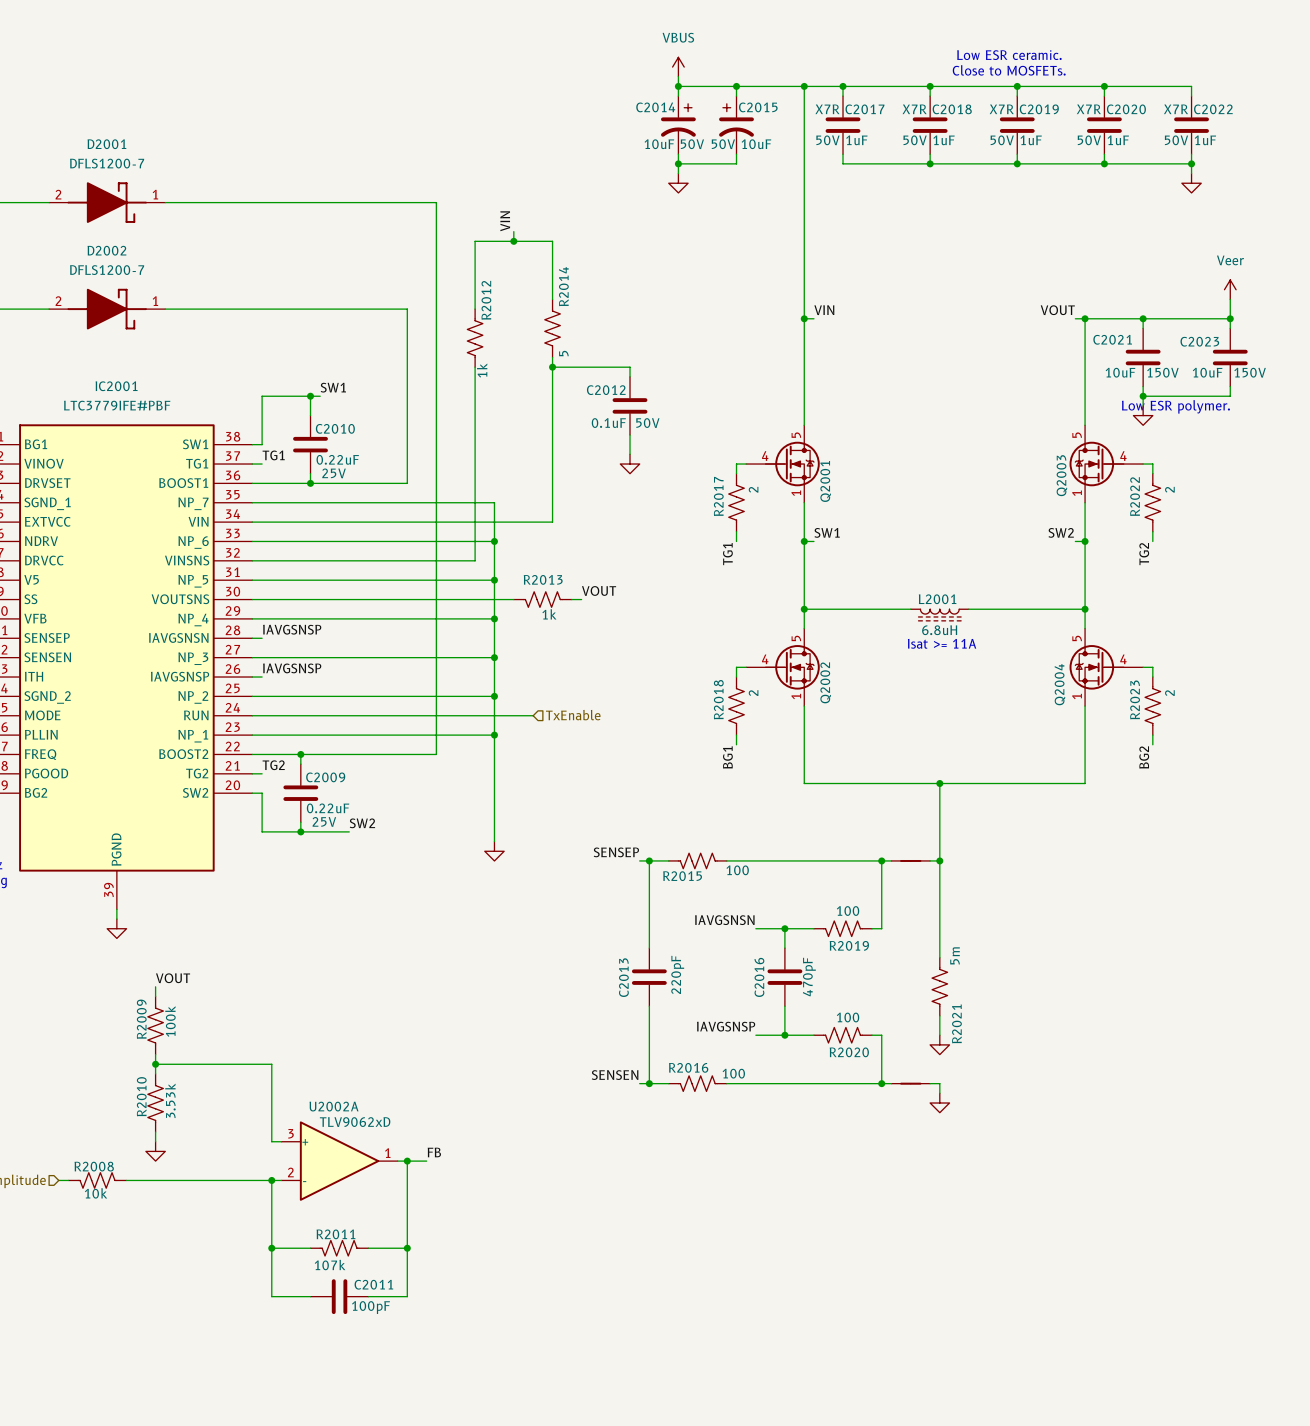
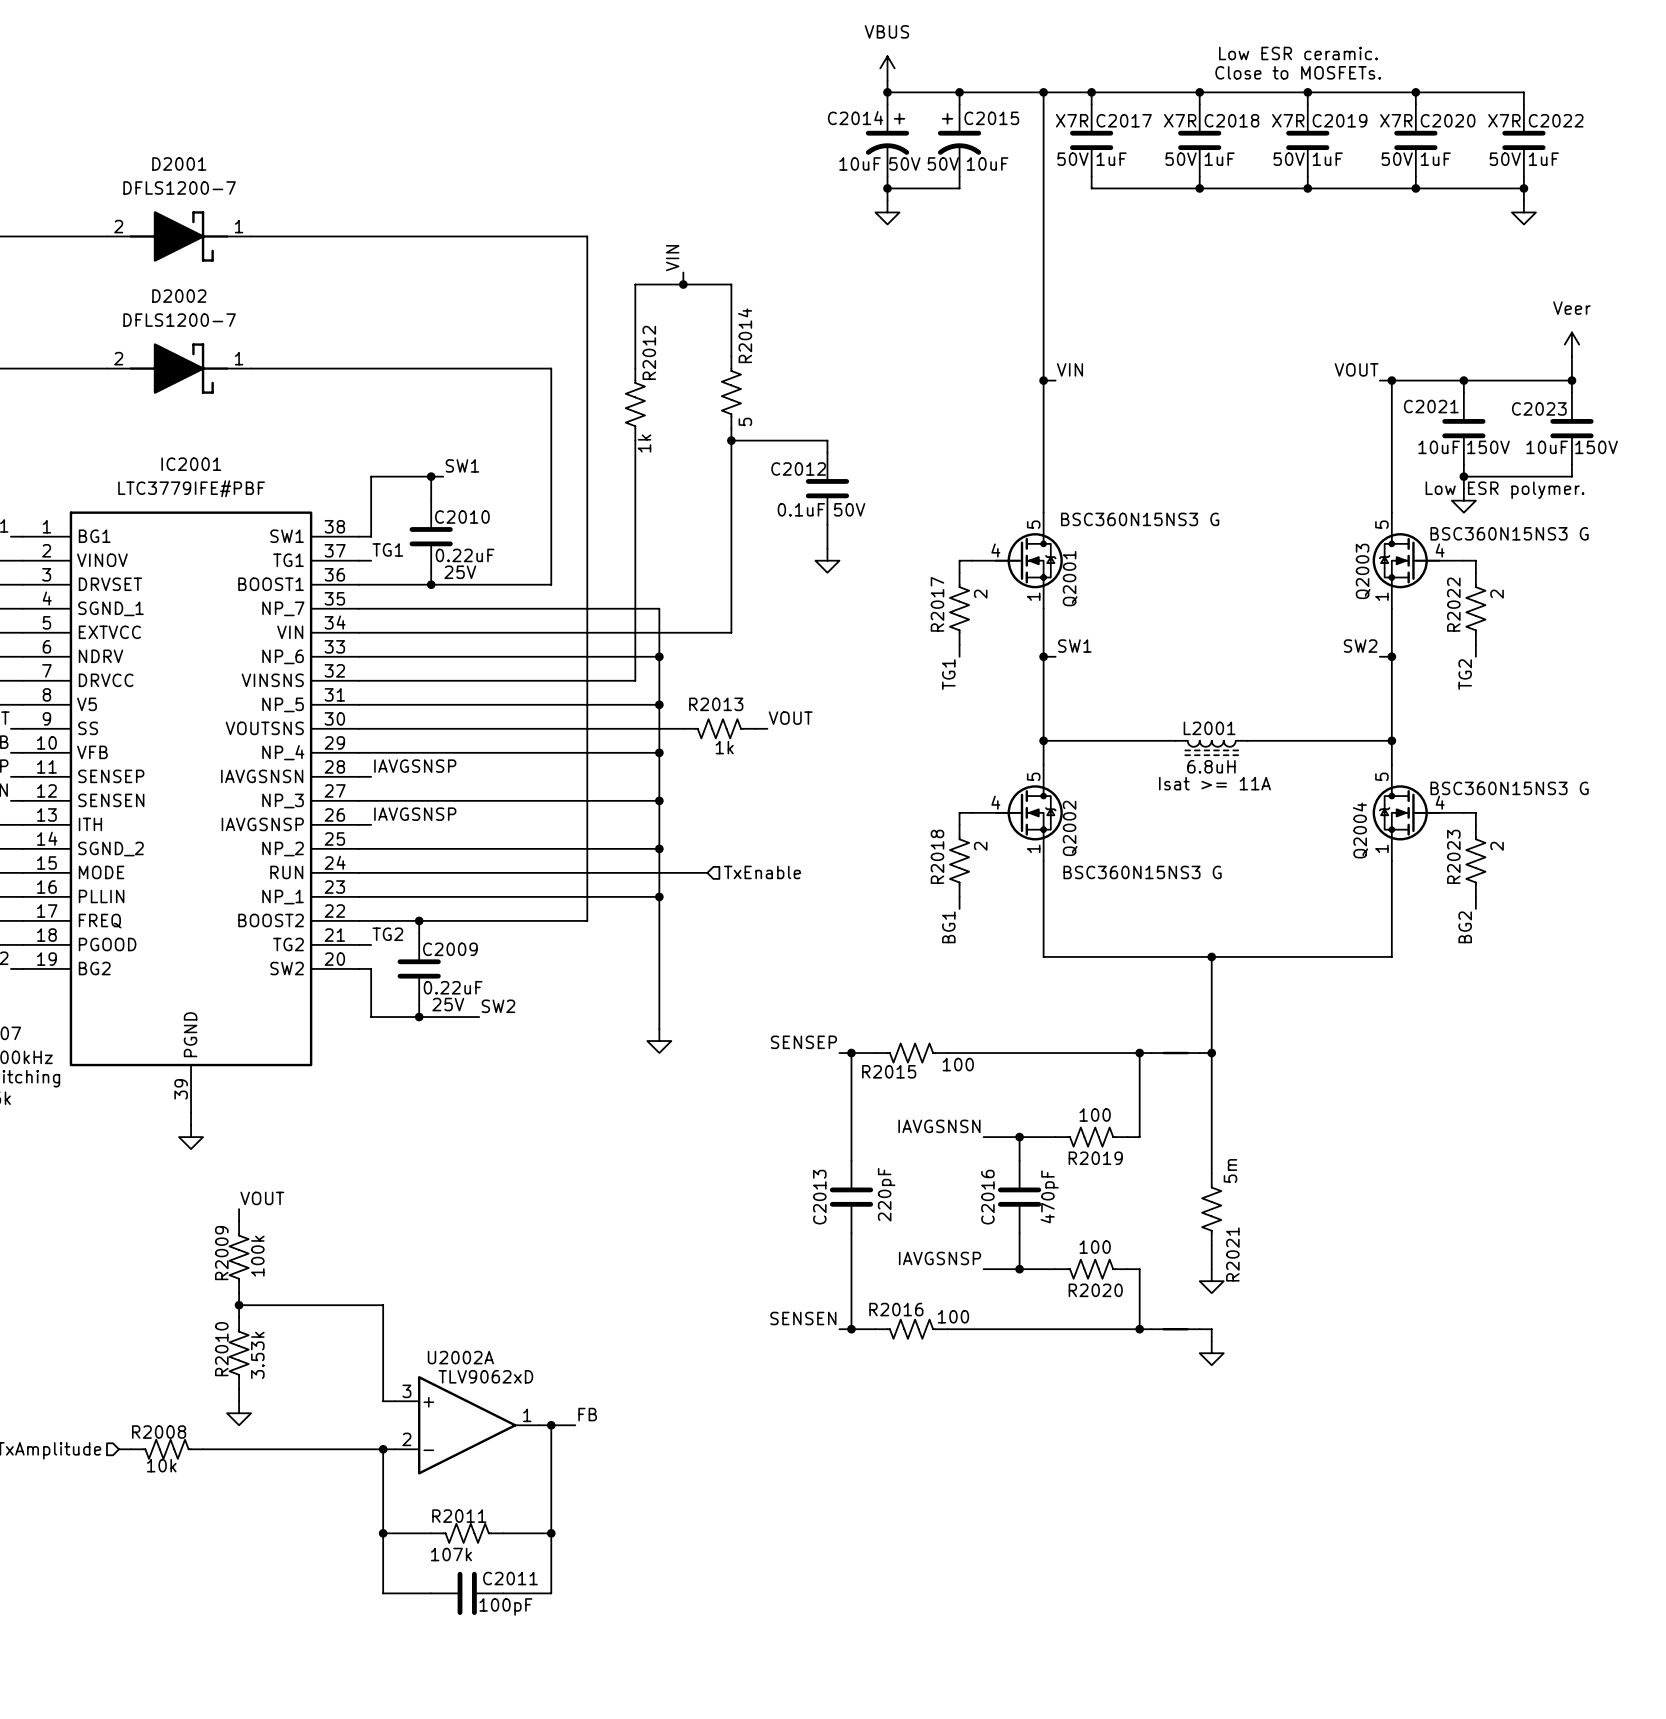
Q2001 value: none -> BSC360N15NS3 G (1140, 519)
Q2003 value: none -> BSC360N15NS3 G (1509, 533)
Q2004 value: none -> BSC360N15NS3 G (1509, 788)
Q2002 value: none -> BSC360N15NS3 G (1142, 872)

